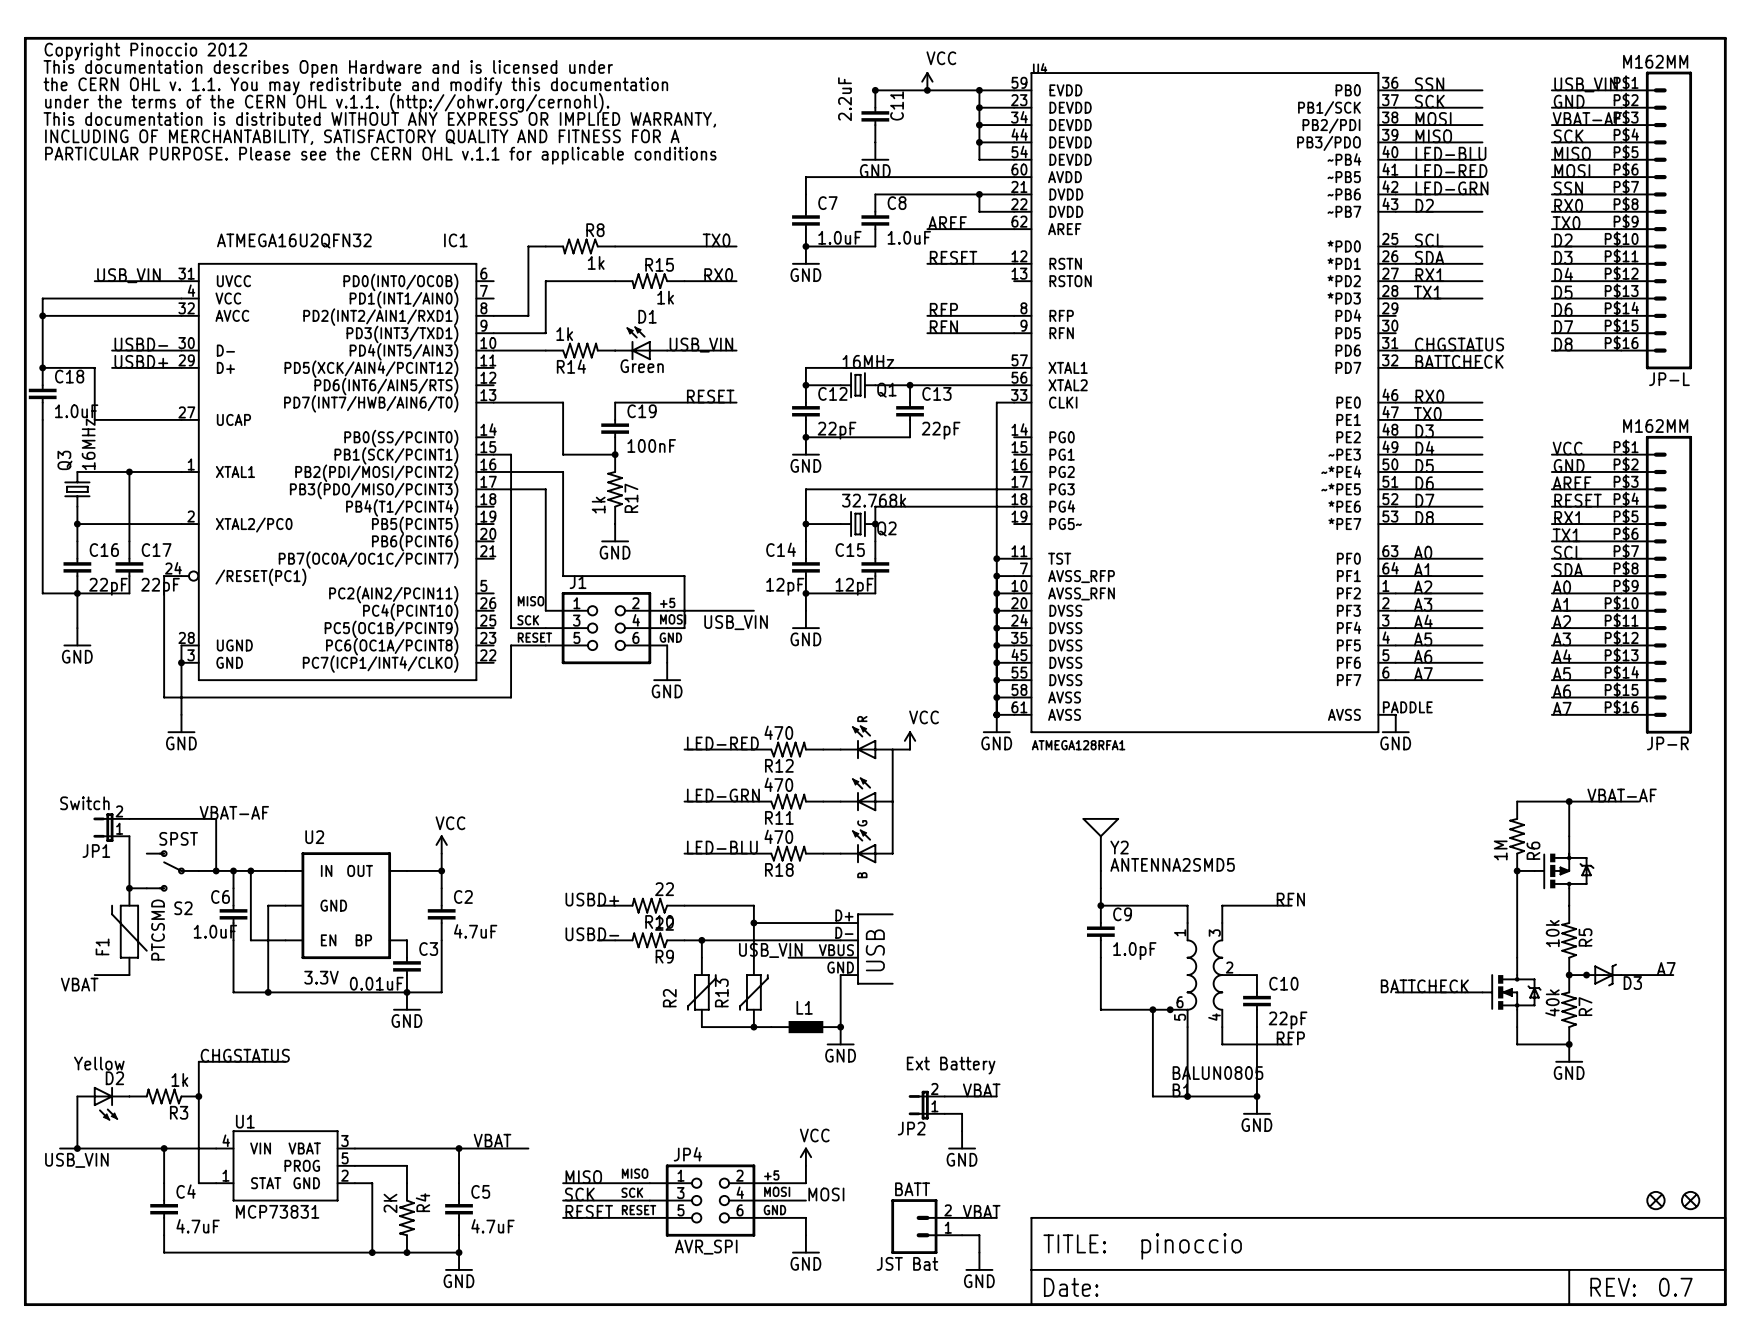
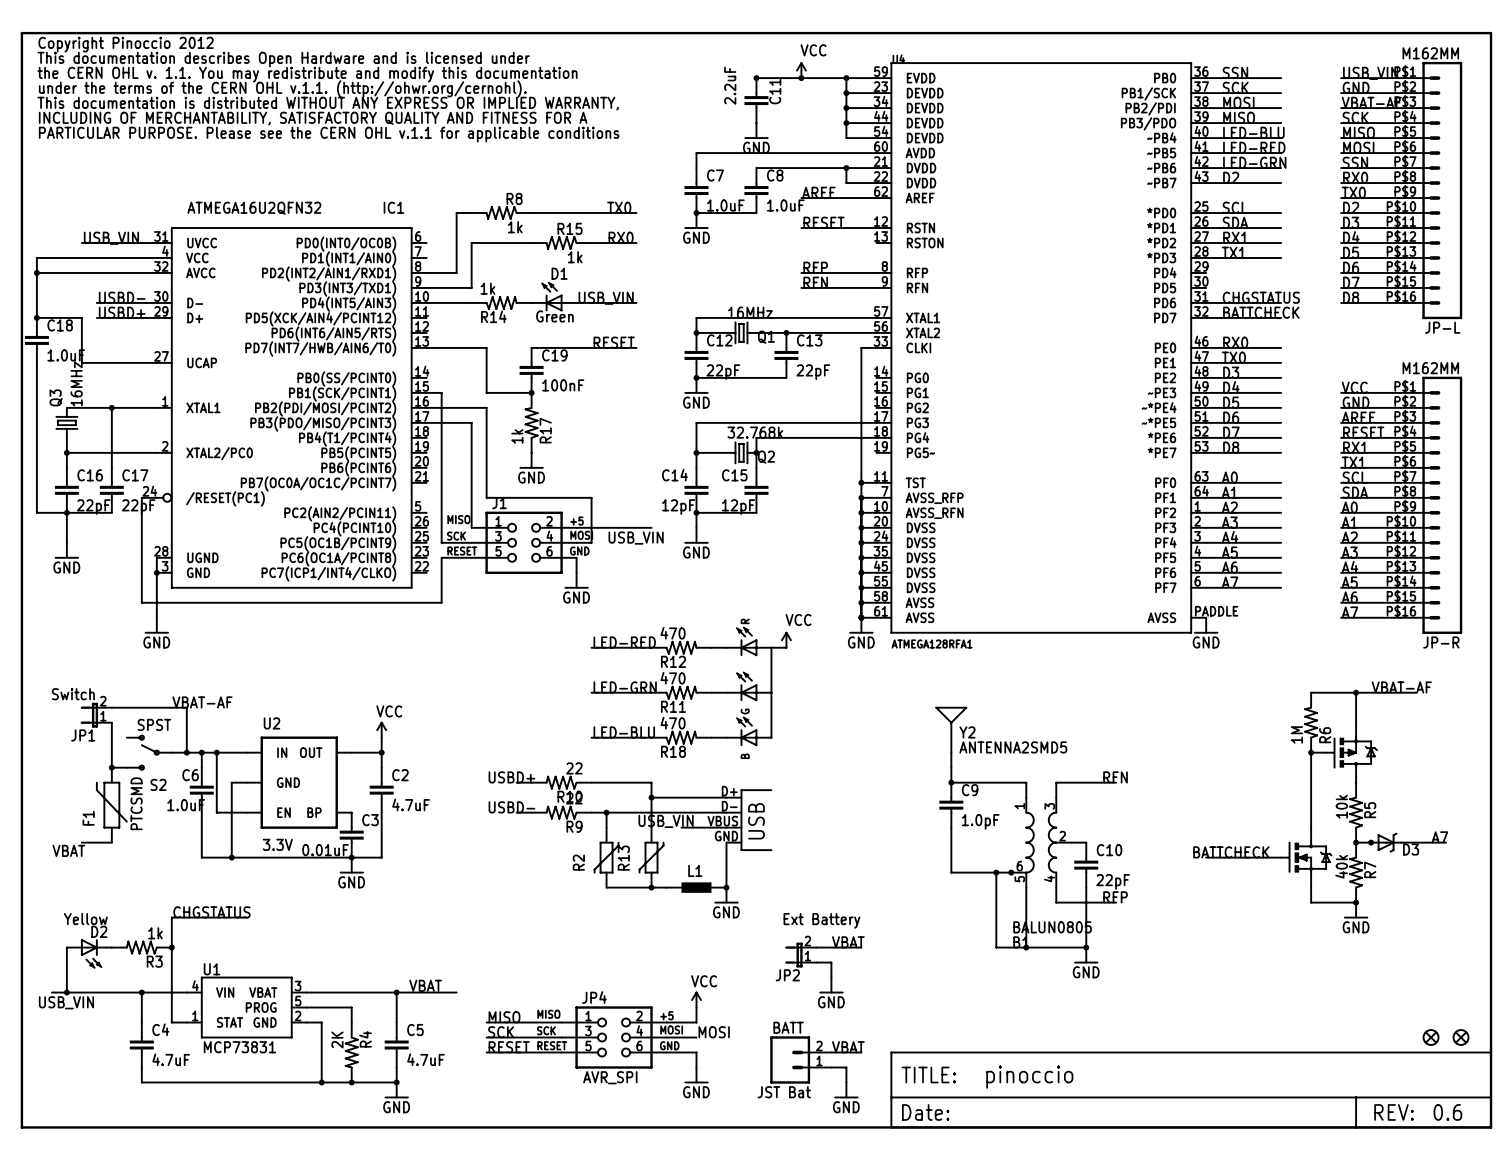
text: 0.7 (1675, 1287) -> 0.6 (1447, 1112)

